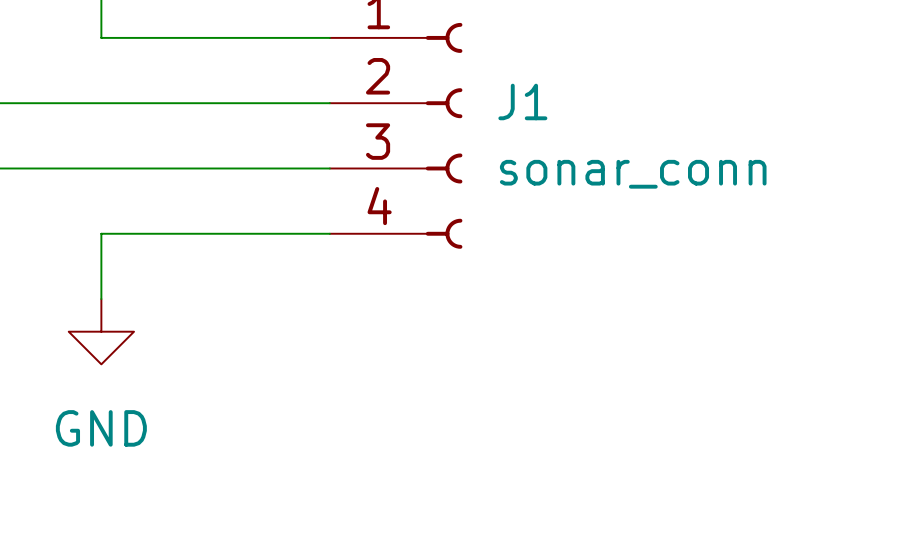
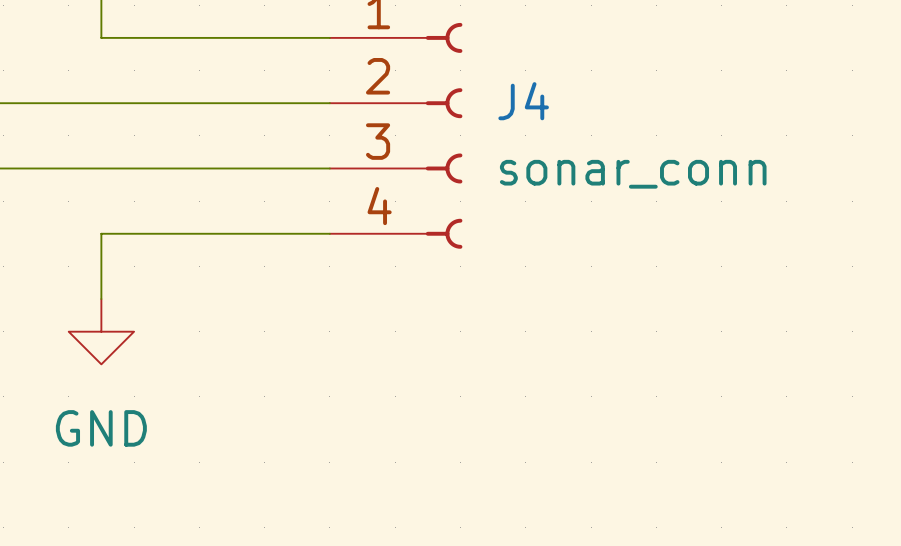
J1 name: J1 (522, 101) -> J4 (523, 101)

